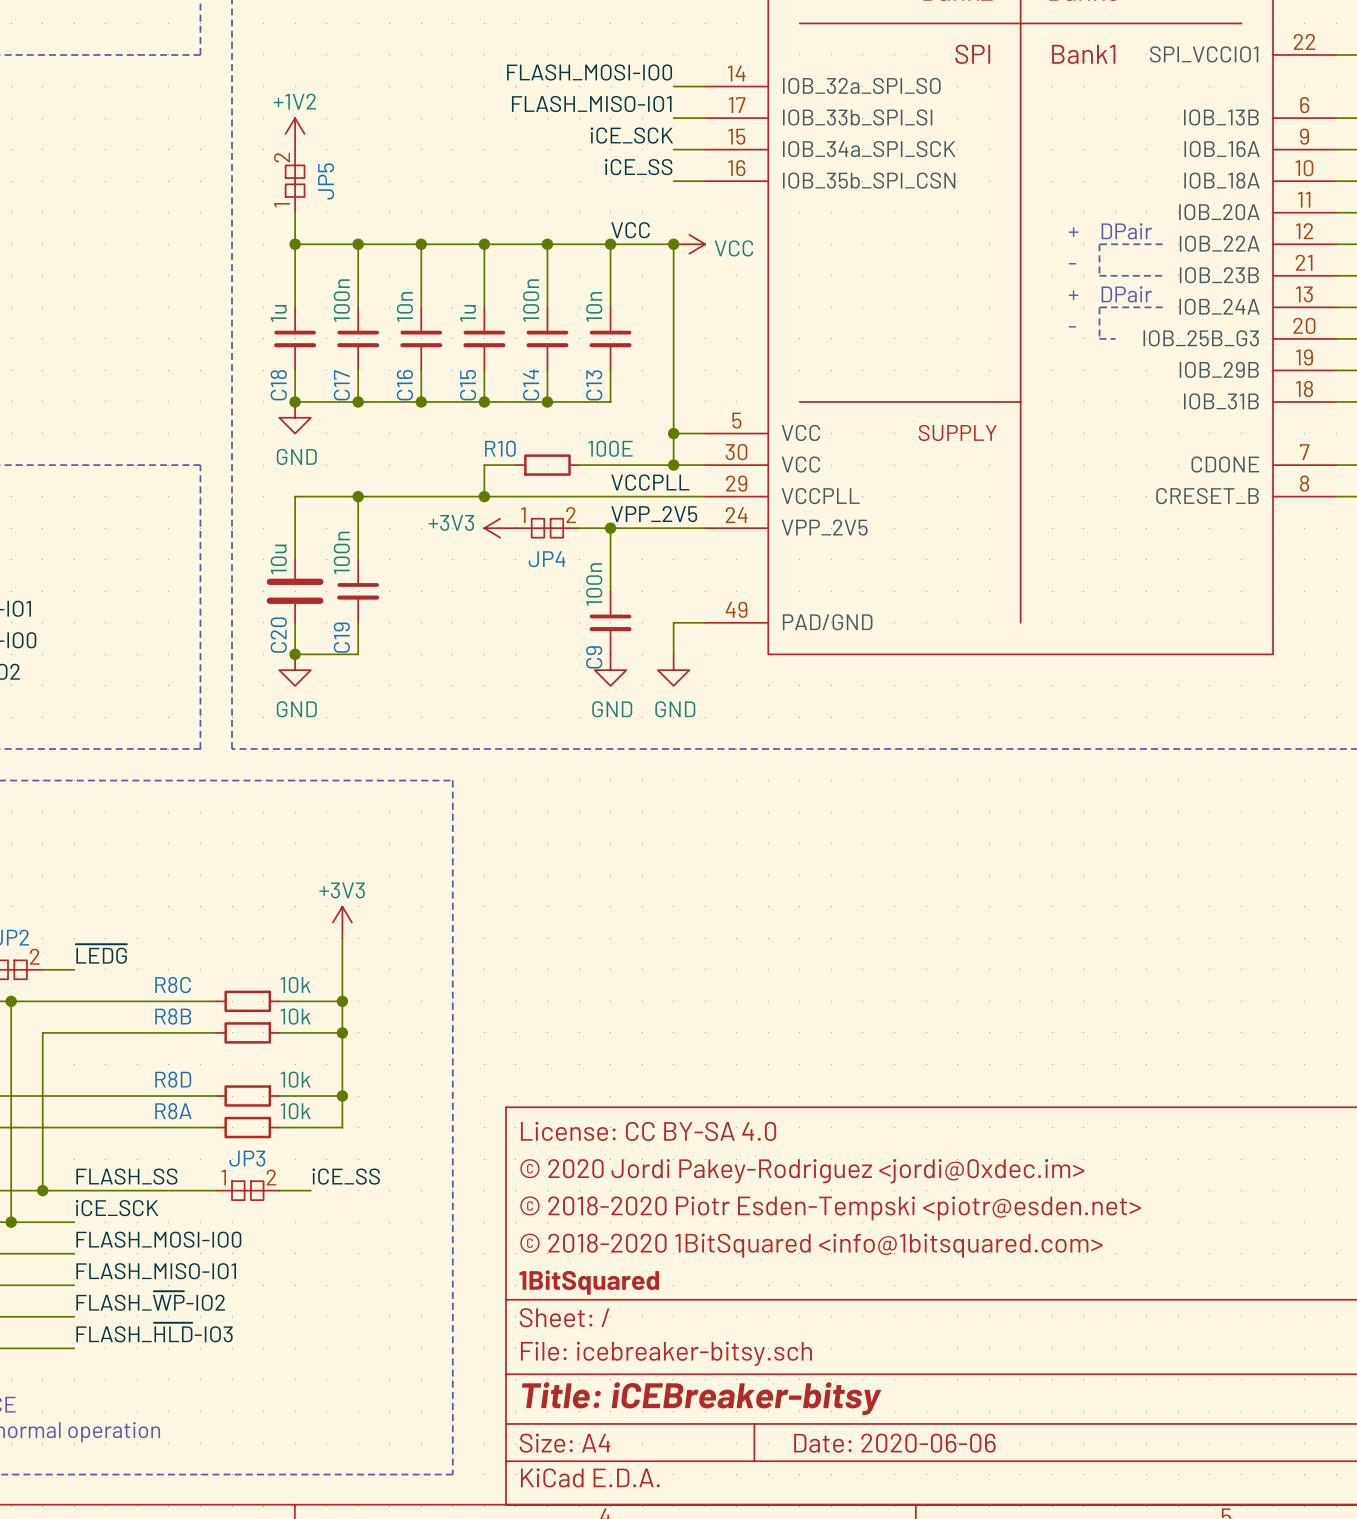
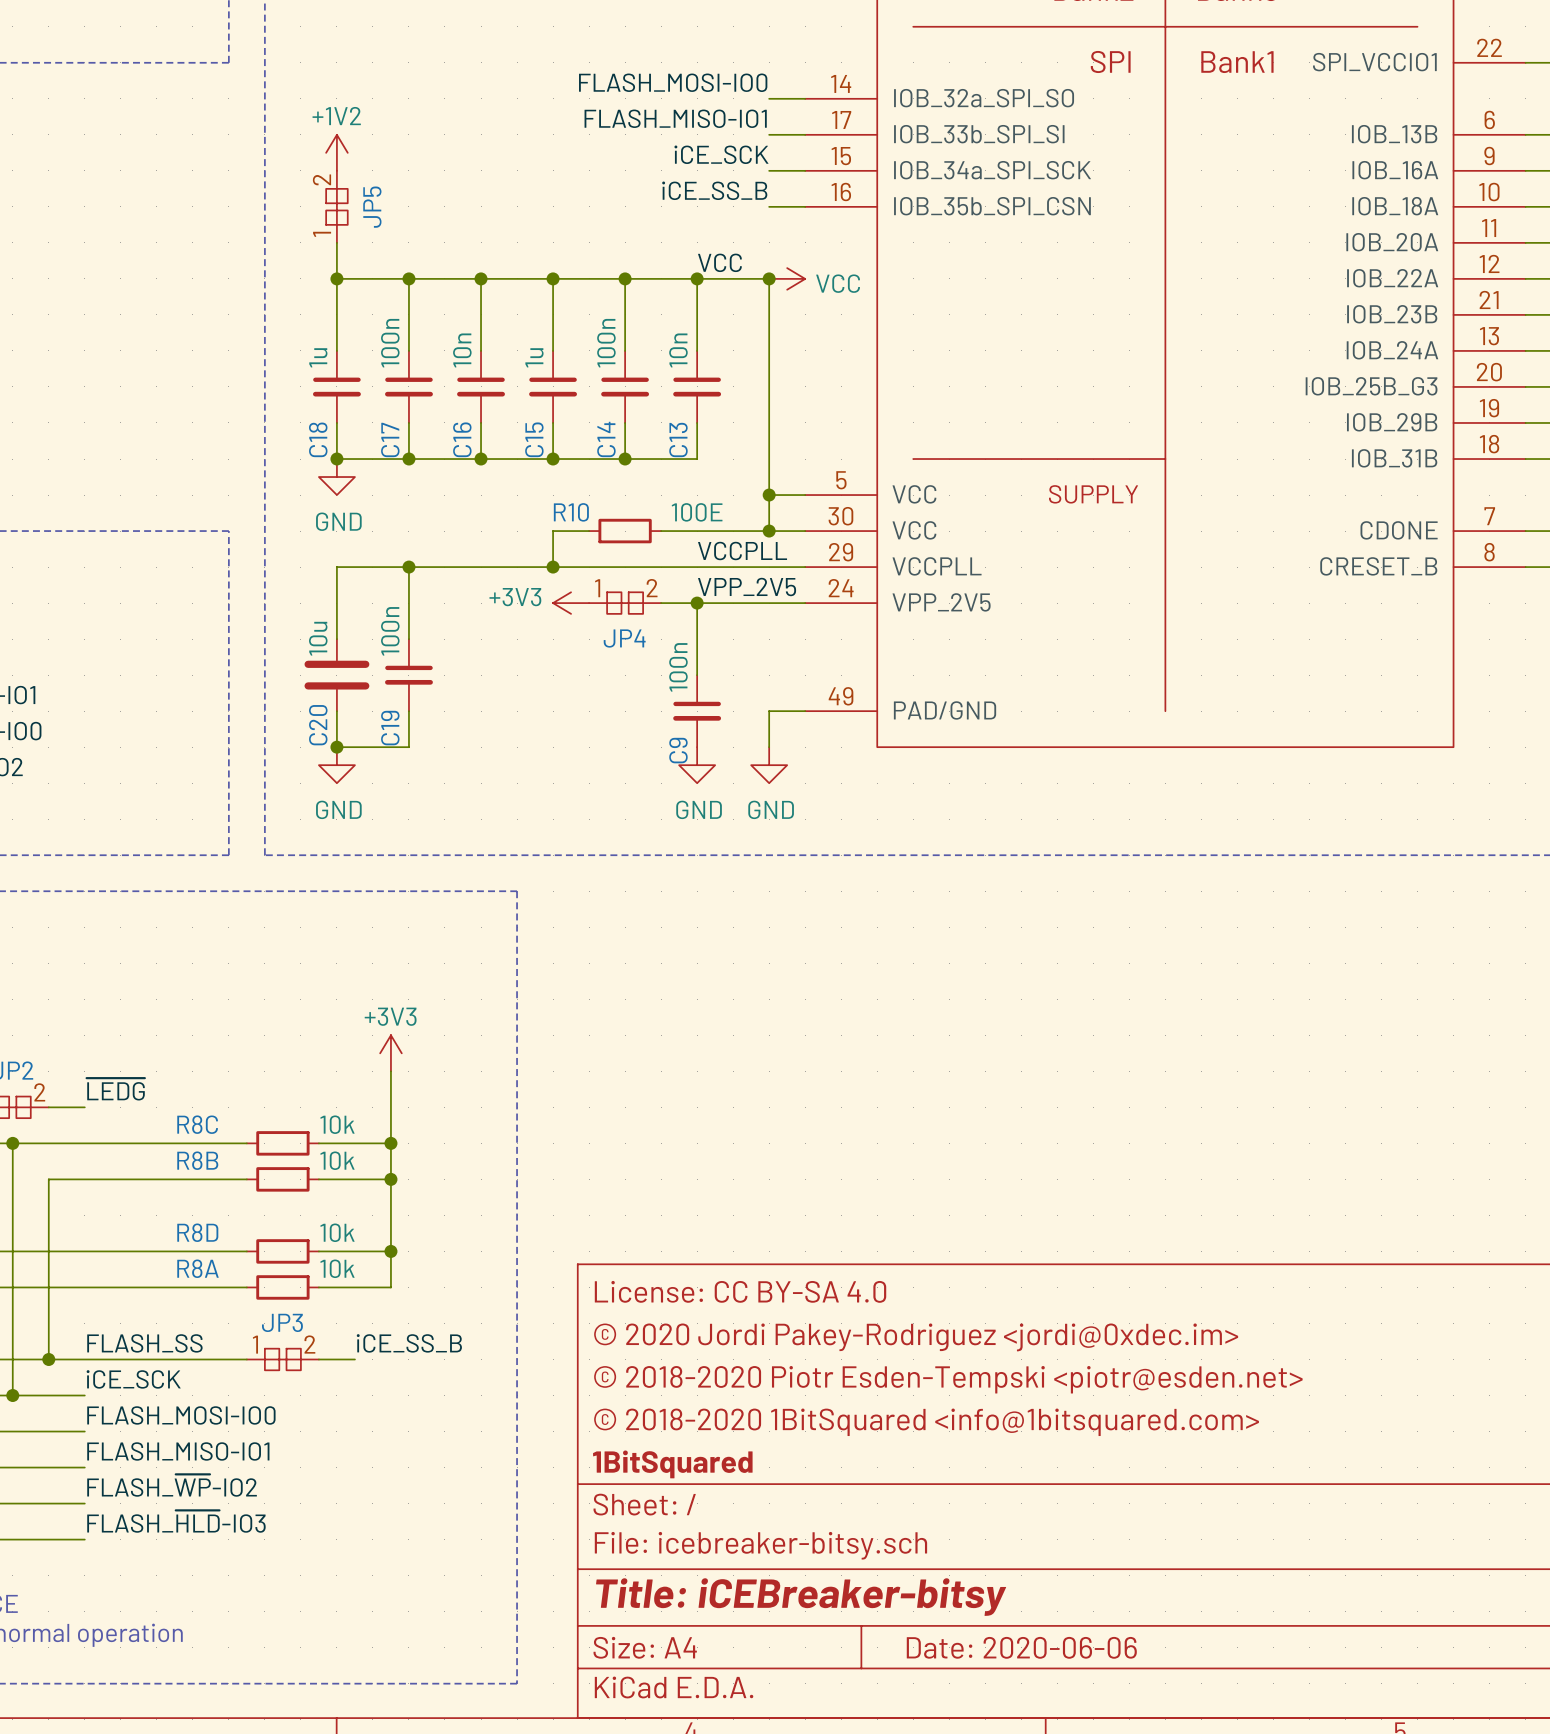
label: iCE_SS (638, 167) -> iCE_SS_B (714, 190)
text: DPair (1126, 231) -> none
text: + (1073, 232) -> none
line: (1162, 244) (1099, 244) (1099, 275) (1162, 275) -> none
text: - (1072, 263) -> none
text: DPair (1126, 294) -> none
text: + (1073, 295) -> none
line: (1162, 307) (1099, 307) (1099, 338) (1115, 338) -> none
text: - (1072, 326) -> none
label: iCE_SS (346, 1176) -> iCE_SS_B (409, 1343)

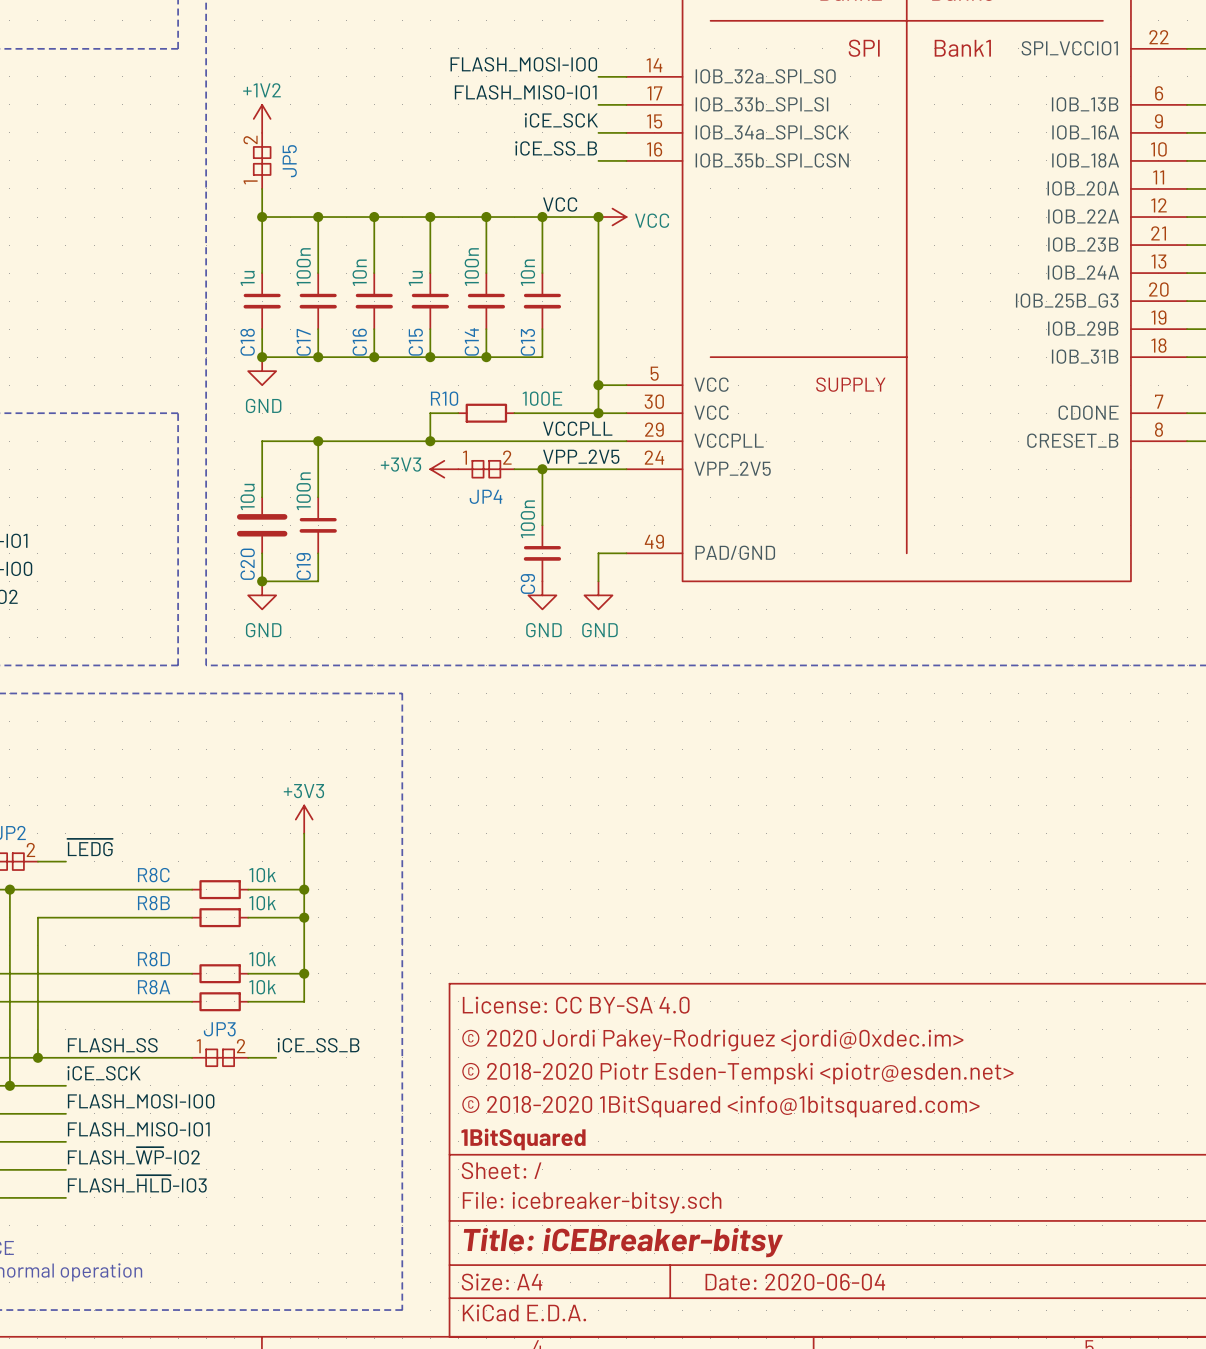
title block: Date: 2020-06-06 (1021, 1647) -> Date: 2020-06-04 (795, 1282)

